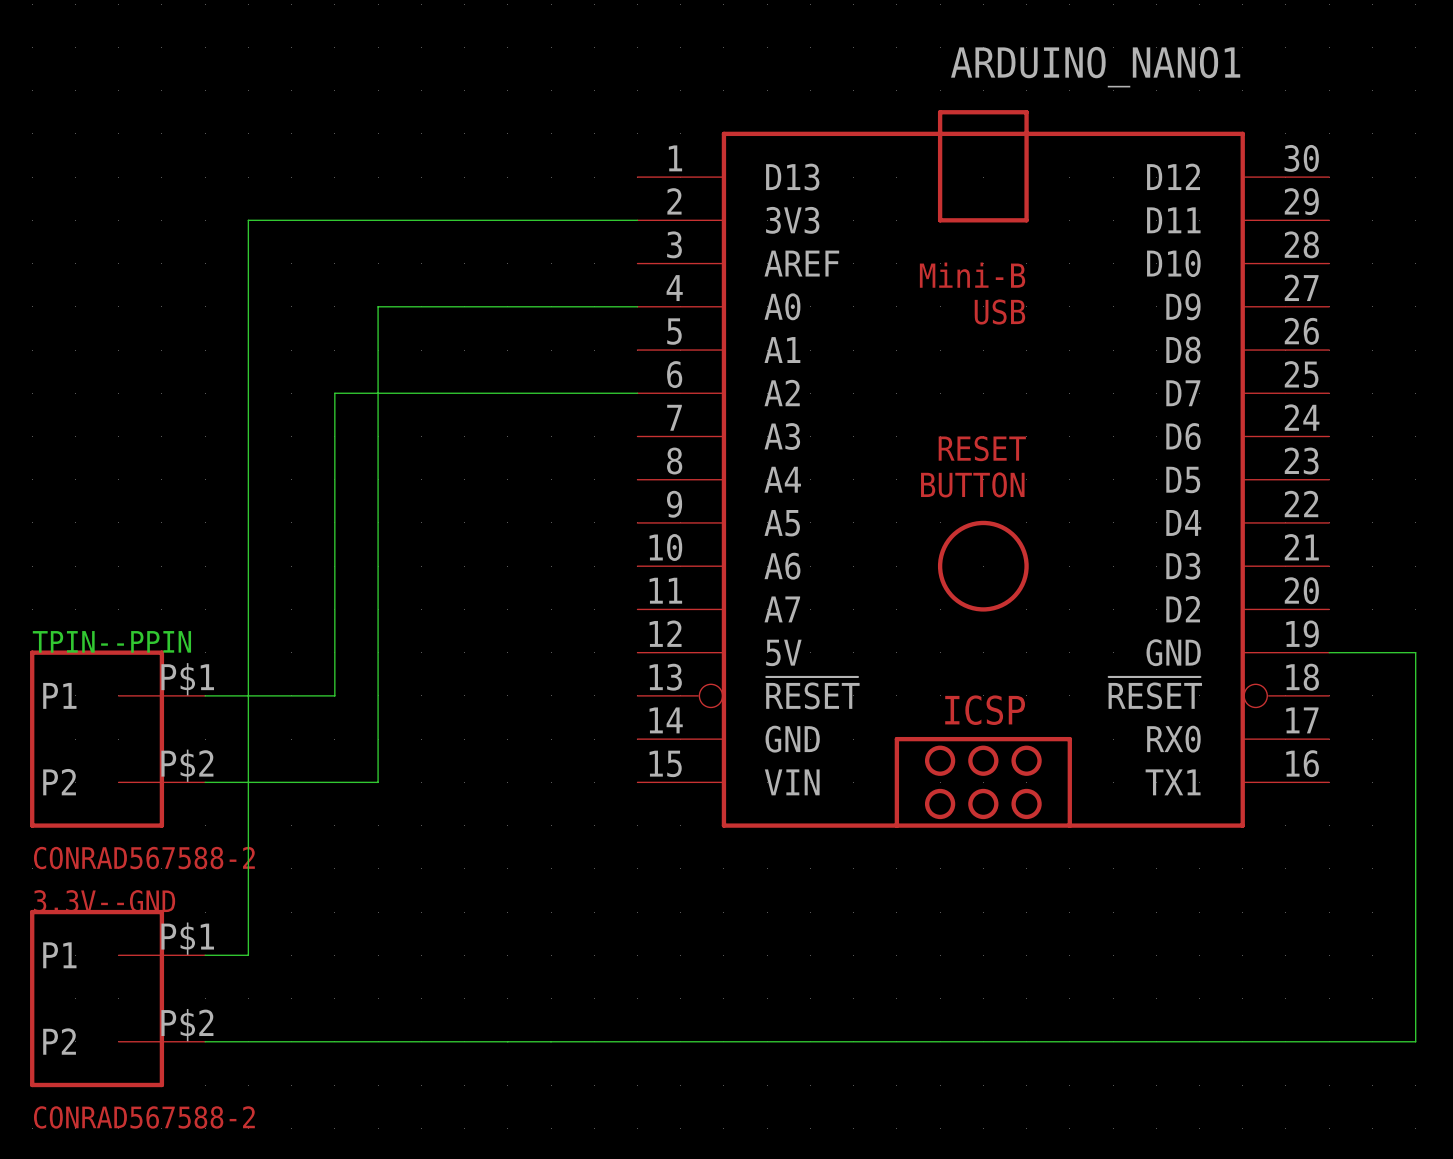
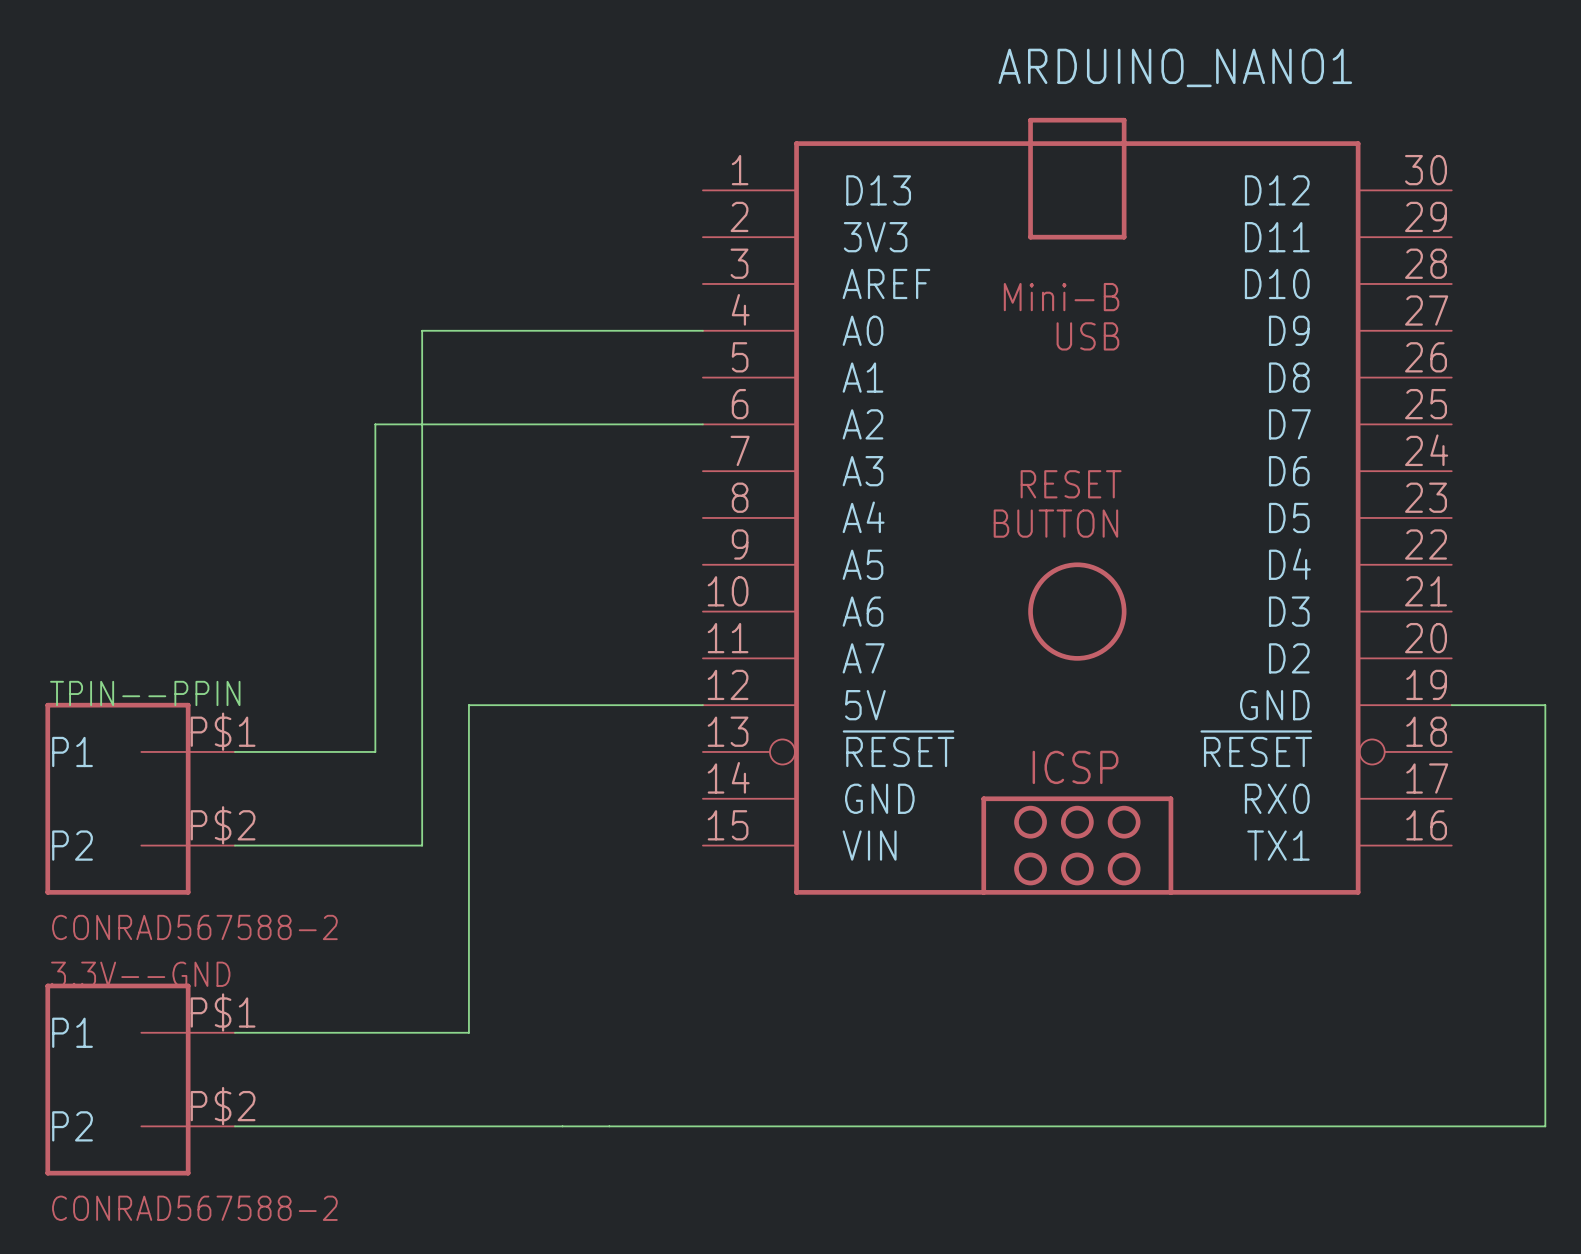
wire: (637, 220) (248, 220) (248, 955) -> (702, 705) (468, 705) (468, 1032) (281, 1032)

